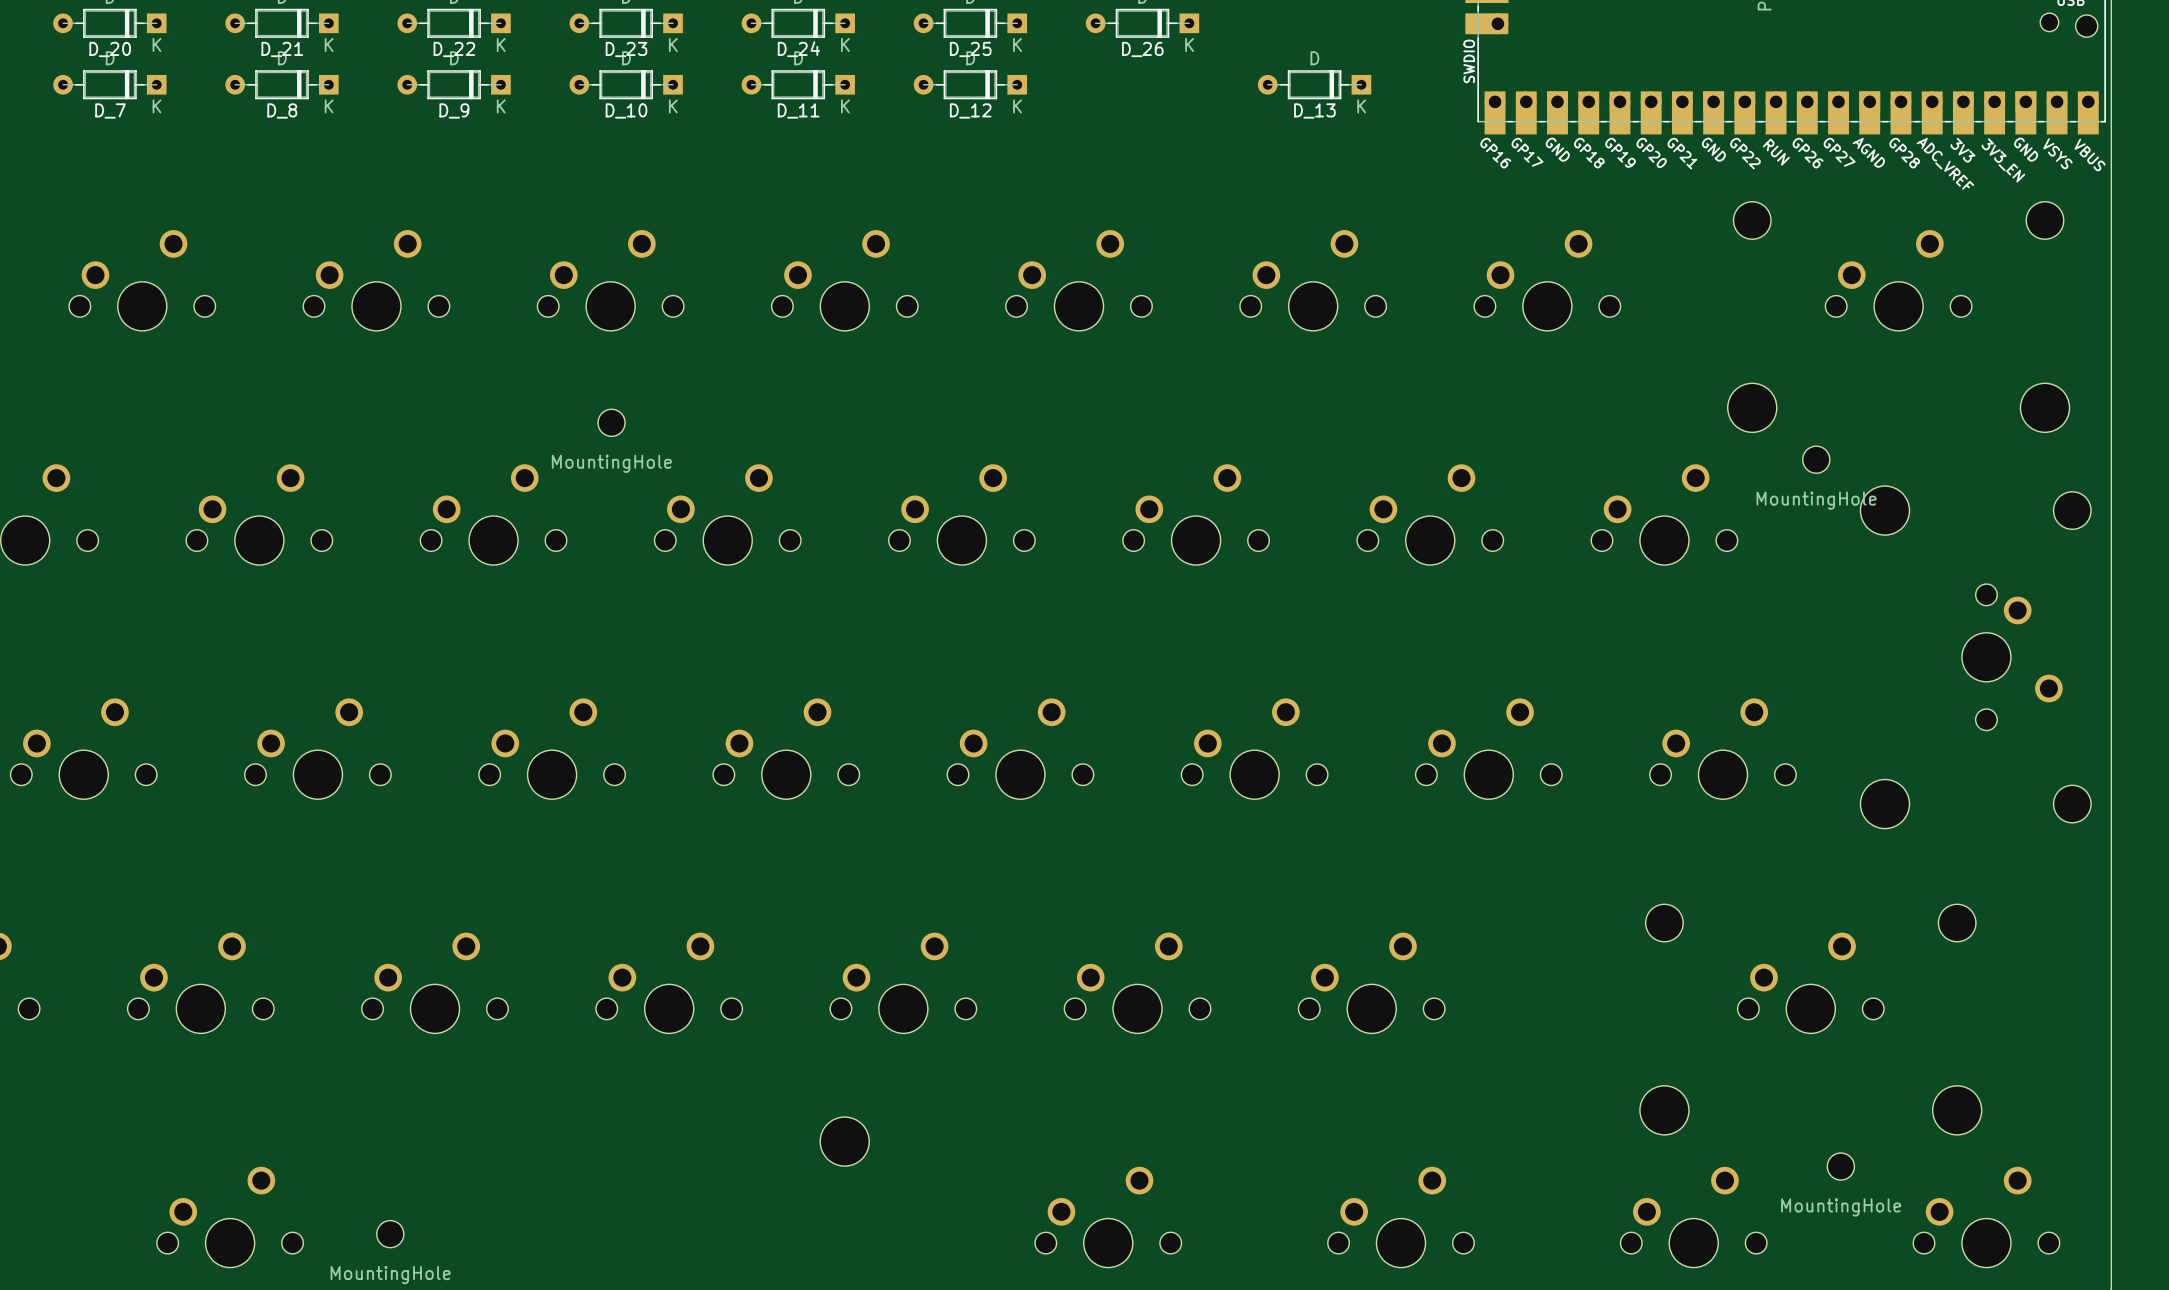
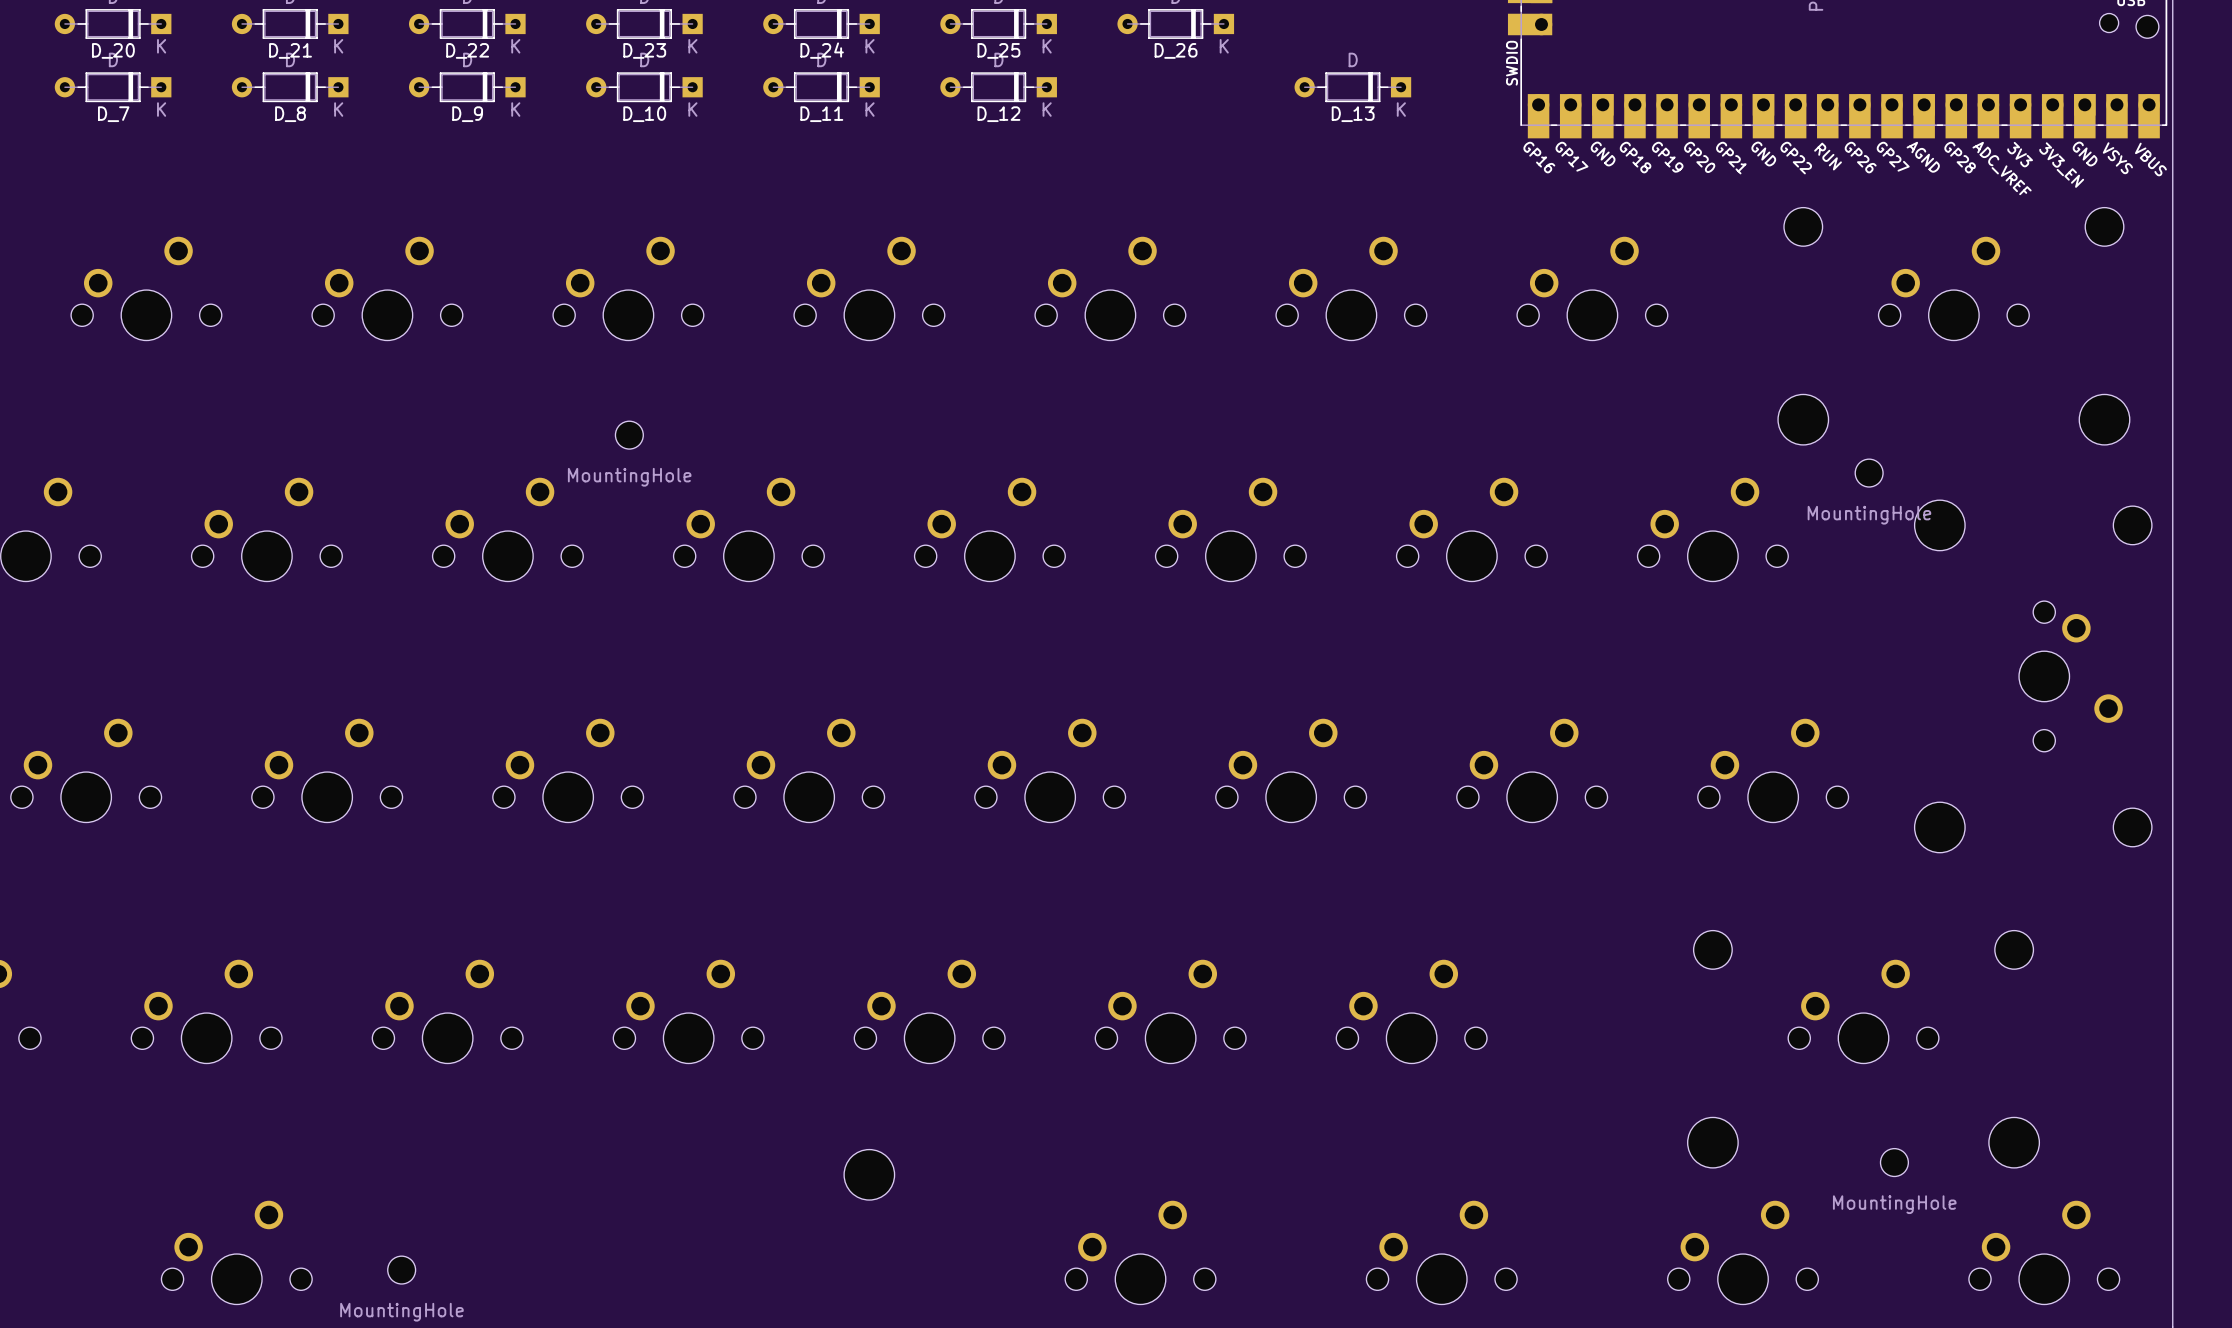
part position: (1840, 1166) -> (1894, 1162)

